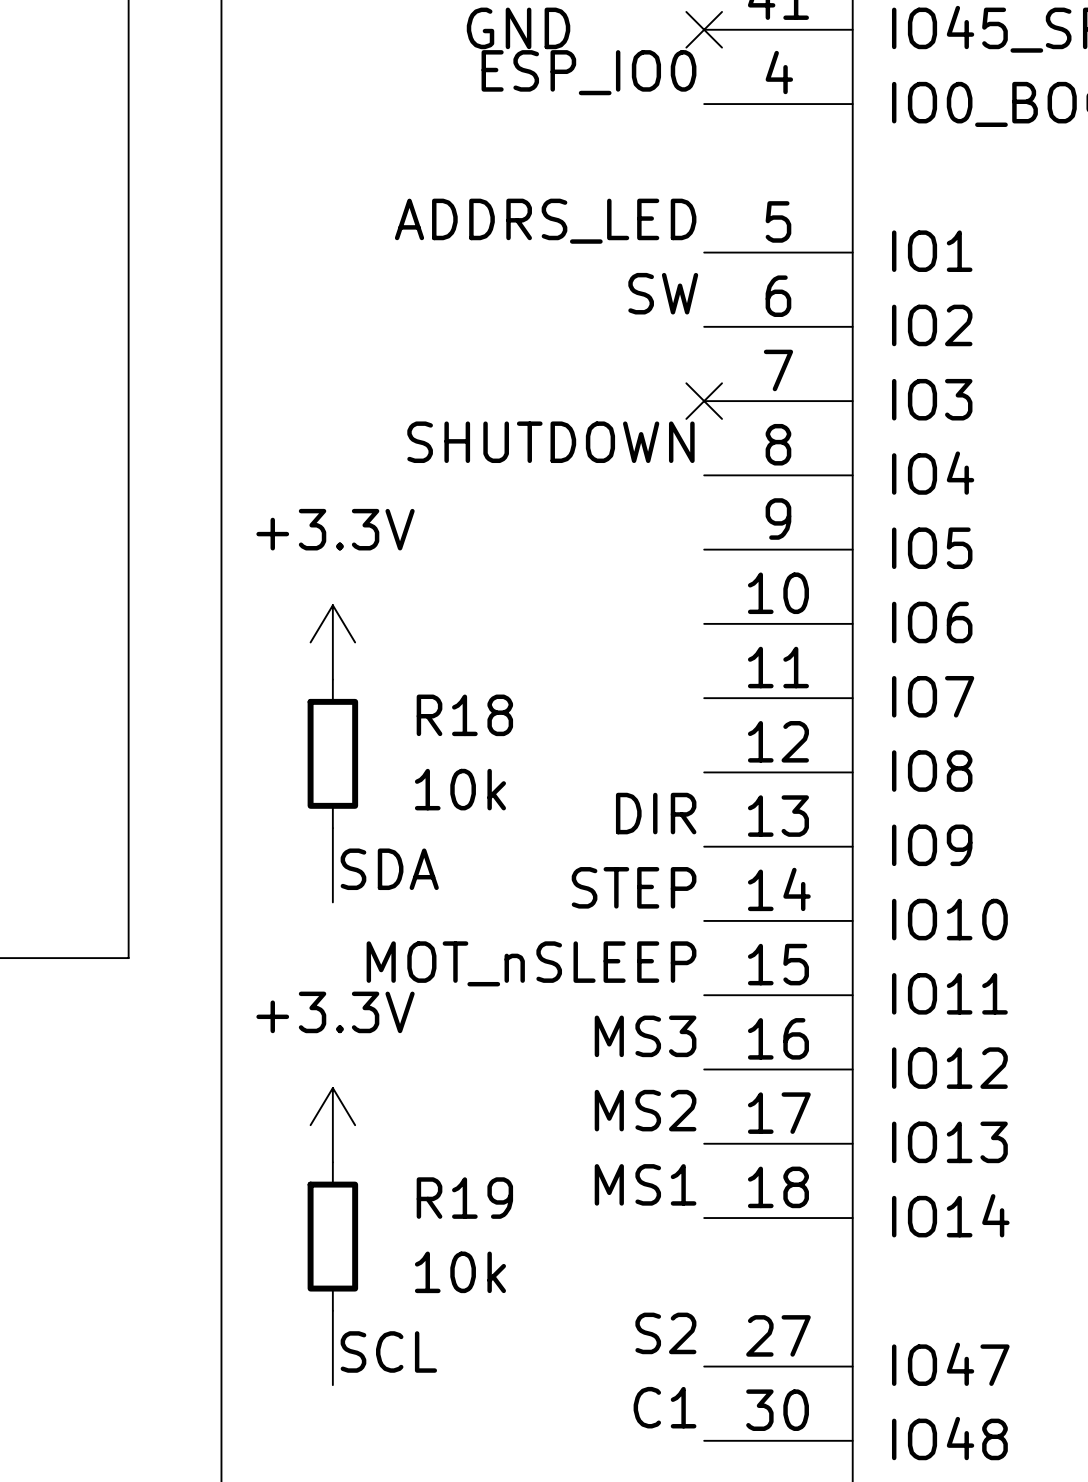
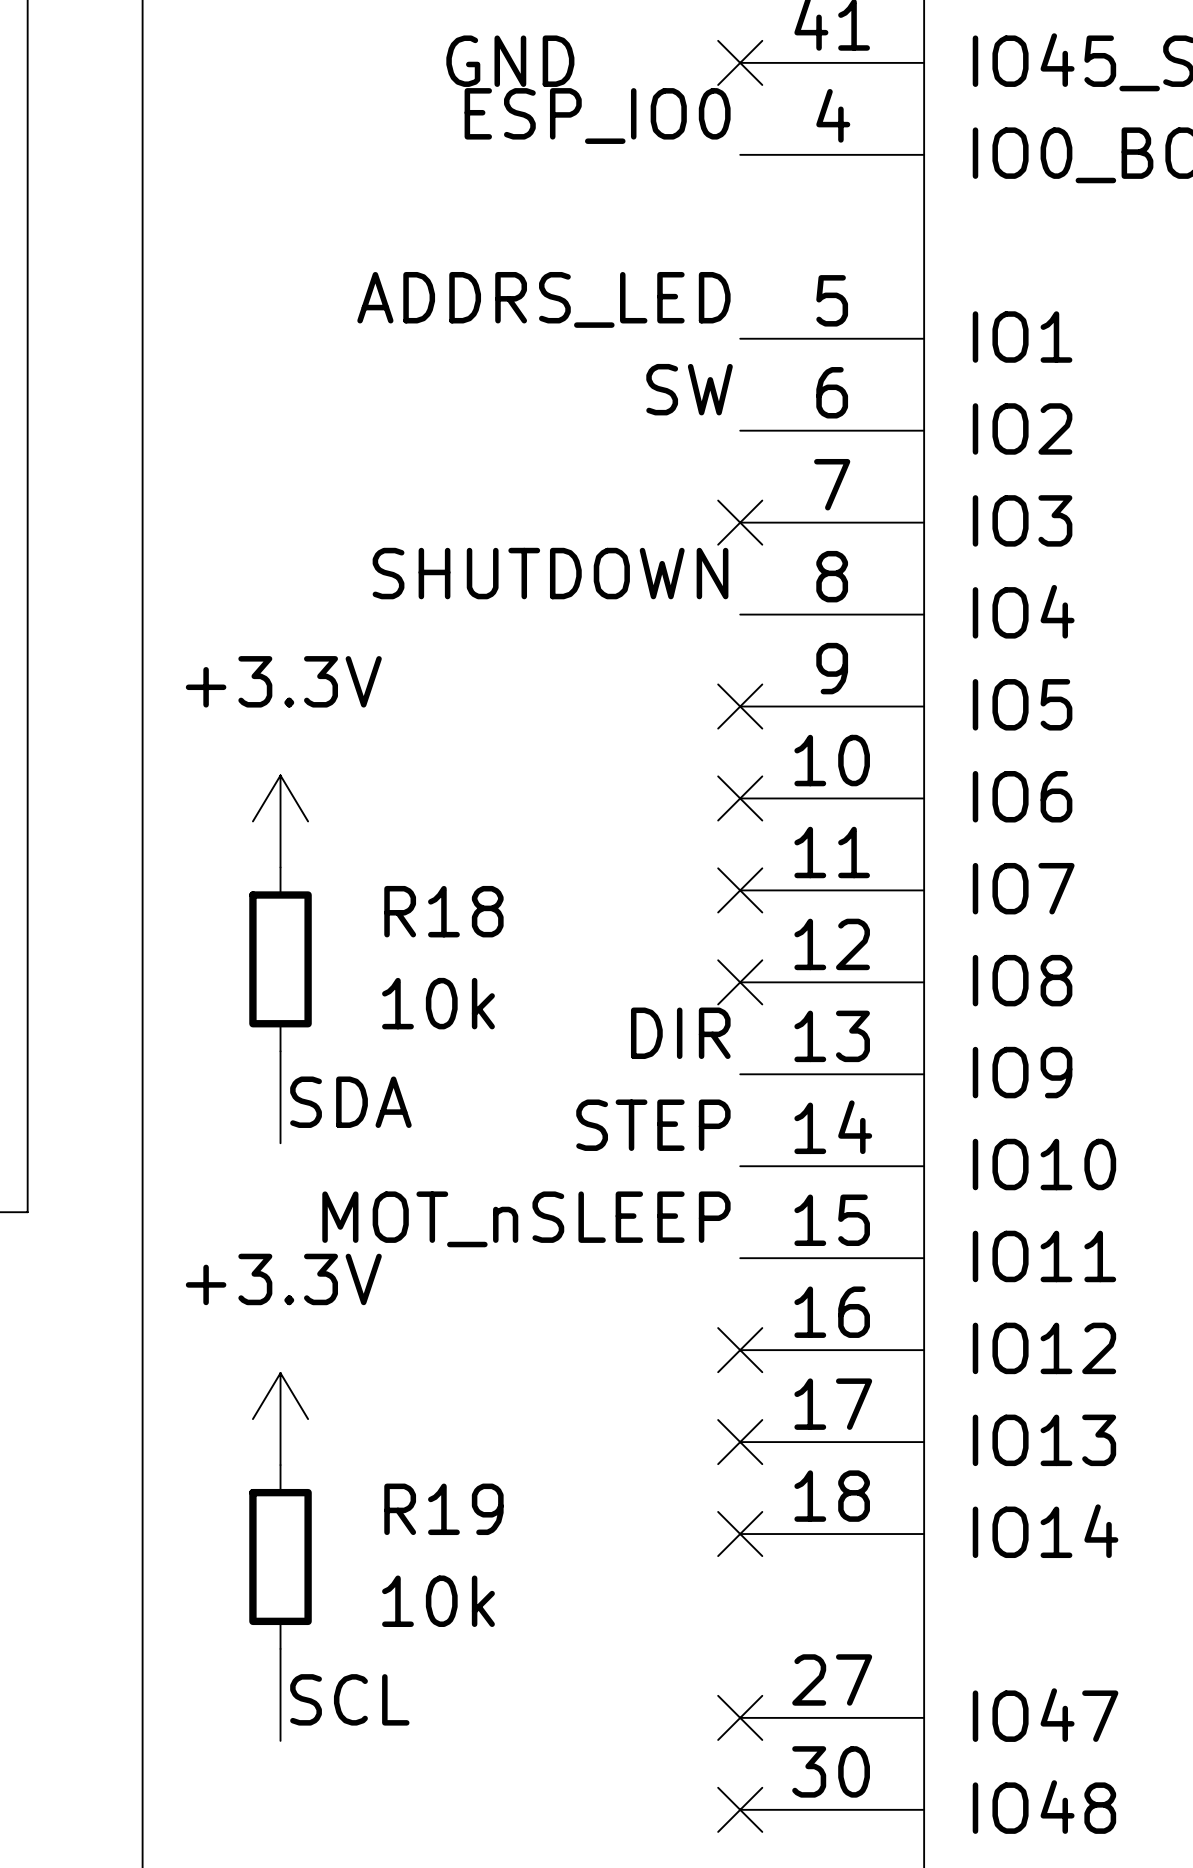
no-connect mark: none -> (740, 706)
no-connect mark: none -> (740, 798)
no-connect mark: none -> (740, 890)
no-connect mark: none -> (740, 982)
label: MS3 (645, 1036) -> none
no-connect mark: none -> (740, 1350)
label: MS2 (645, 1110) -> none
no-connect mark: none -> (740, 1442)
label: MS1 (645, 1184) -> none
no-connect mark: none -> (740, 1534)
label: S2 (665, 1333) -> none
no-connect mark: none -> (740, 1717)
label: C1 (665, 1407) -> none
no-connect mark: none -> (740, 1809)

